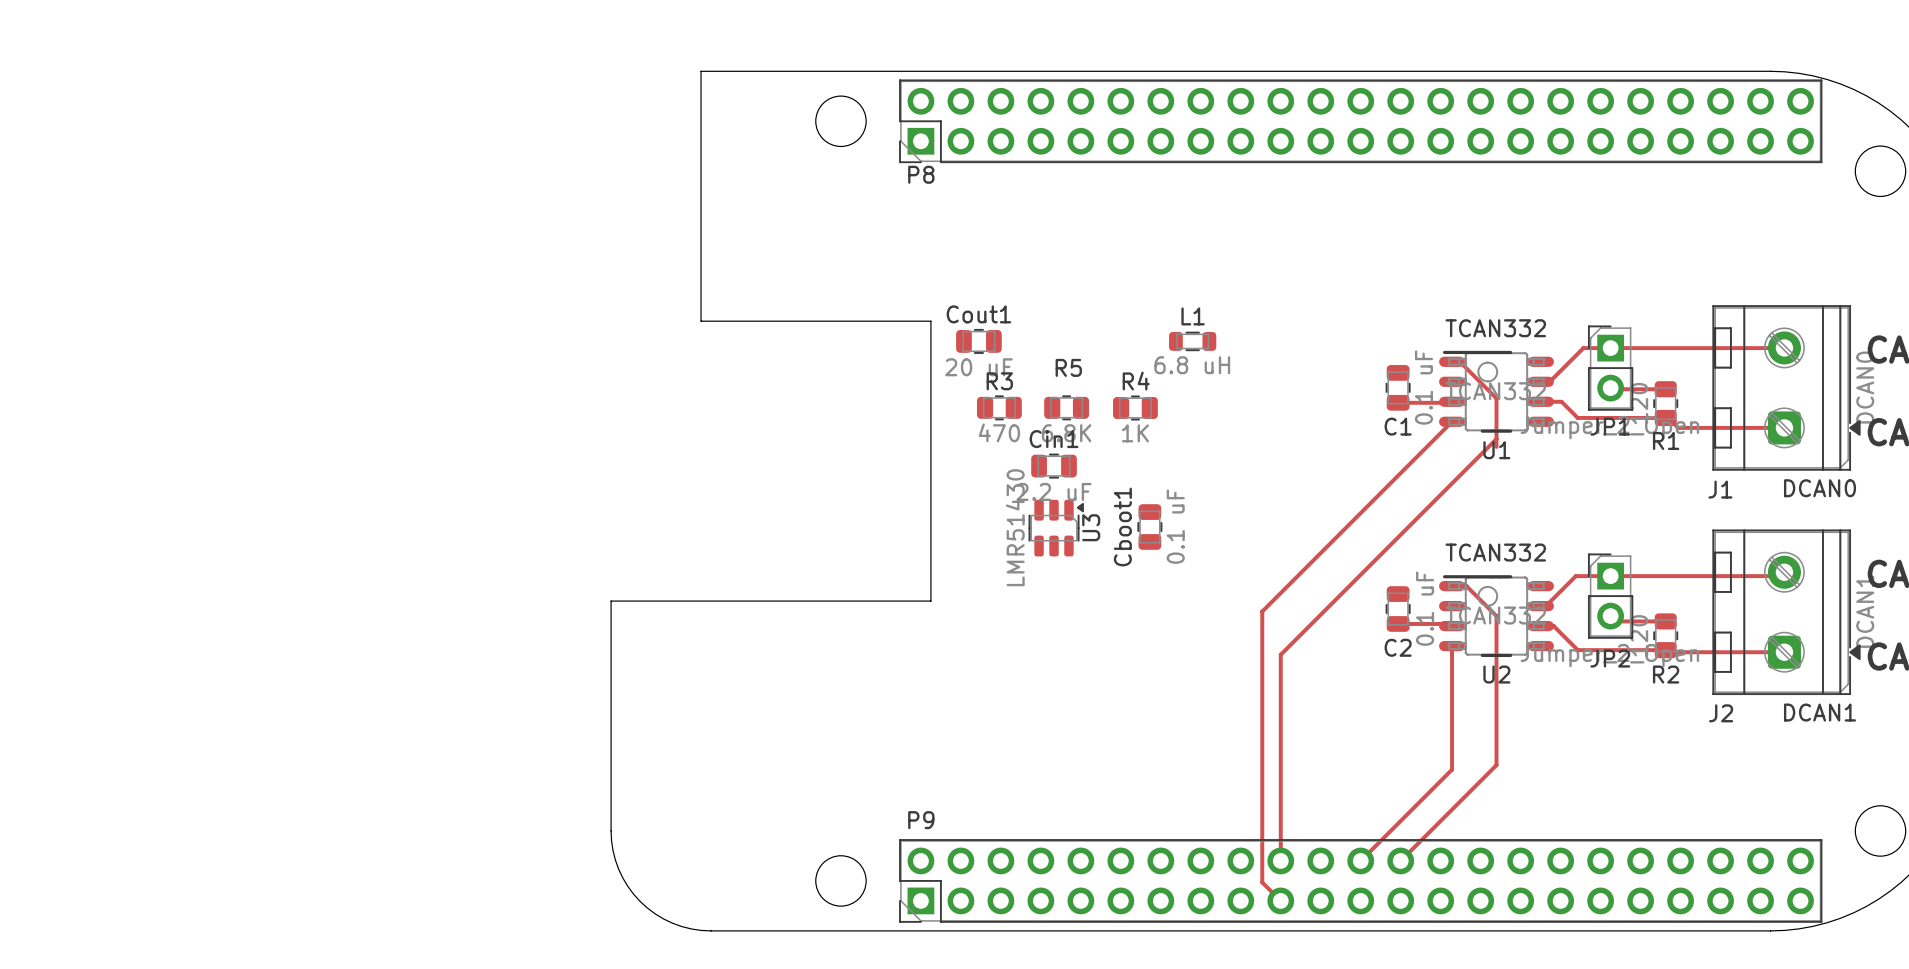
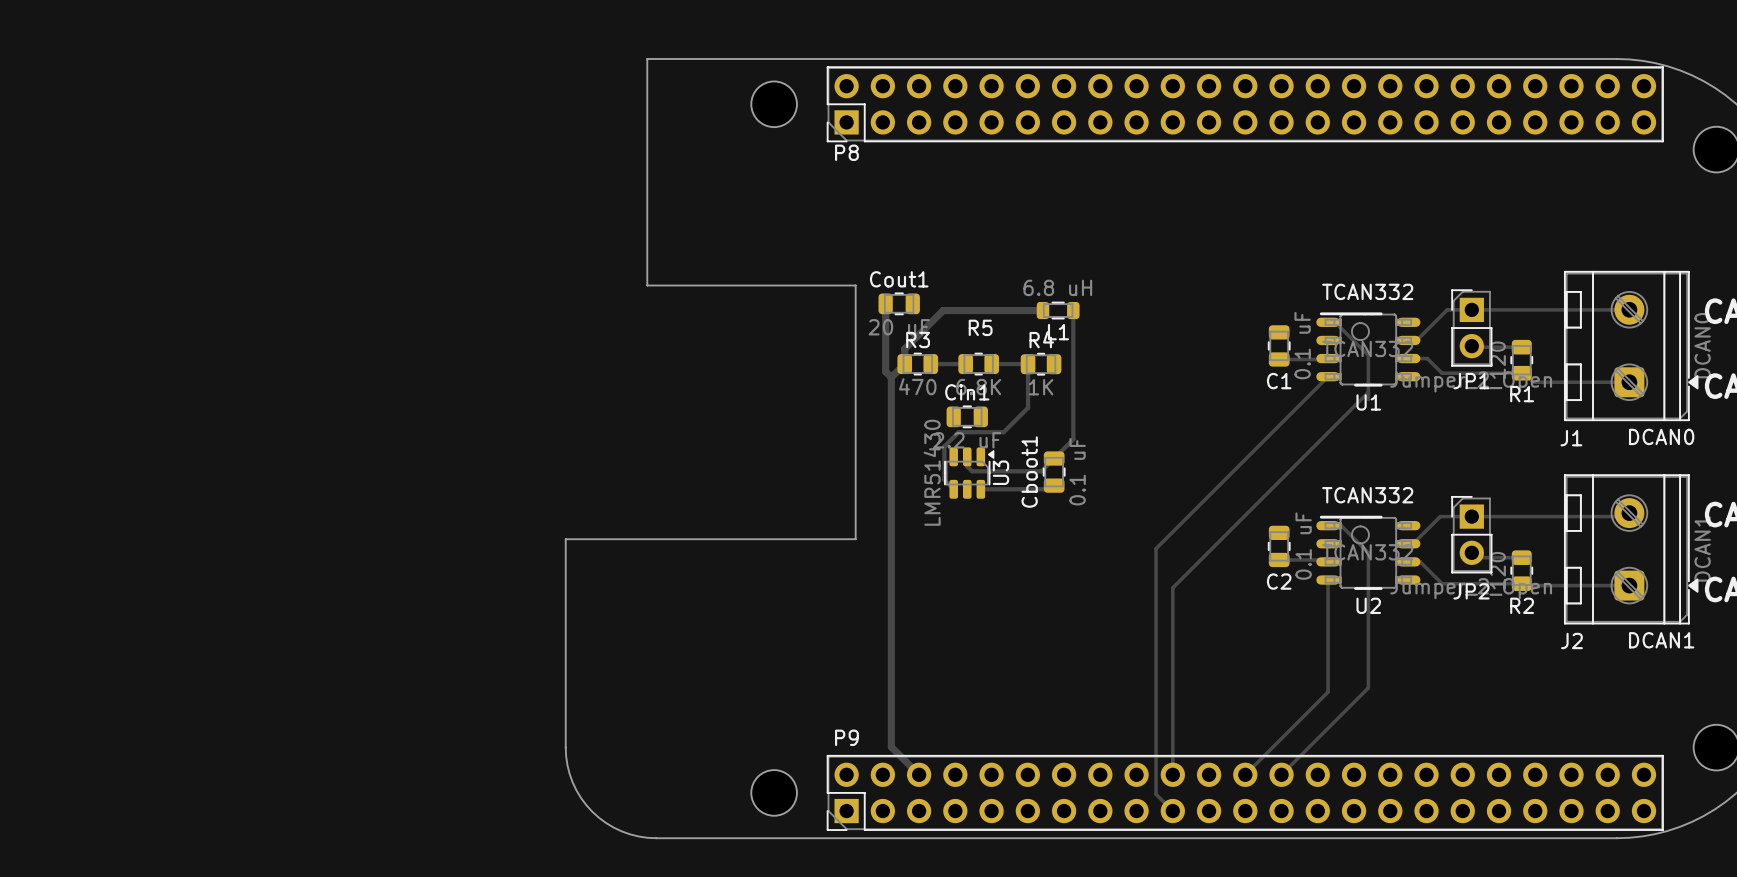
L1 name position: L1 (1193, 316) -> L1 (1058, 332)
track: none -> (885, 303) (885, 371) (891, 377)
L1 position: (1192, 341) -> (1058, 310)
track: none -> (1043, 310) (943, 310) (904, 348) (904, 364) (891, 377)
track: none -> (1073, 310) (1073, 439) (1041, 471) (972, 471) (967, 466) (967, 456)
L1 value position: 6.8 uH (1192, 365) -> 6.8 uH (1057, 287)
track: none -> (930, 364) (965, 364)
track: none -> (991, 364) (1027, 364)
track: none -> (1028, 364) (1028, 407) (1003, 432) (958, 432) (944, 446) (944, 480) (953, 489)
track: none -> (891, 377) (891, 747) (919, 774)
track: none -> (1054, 485) (1050, 489) (980, 489)

